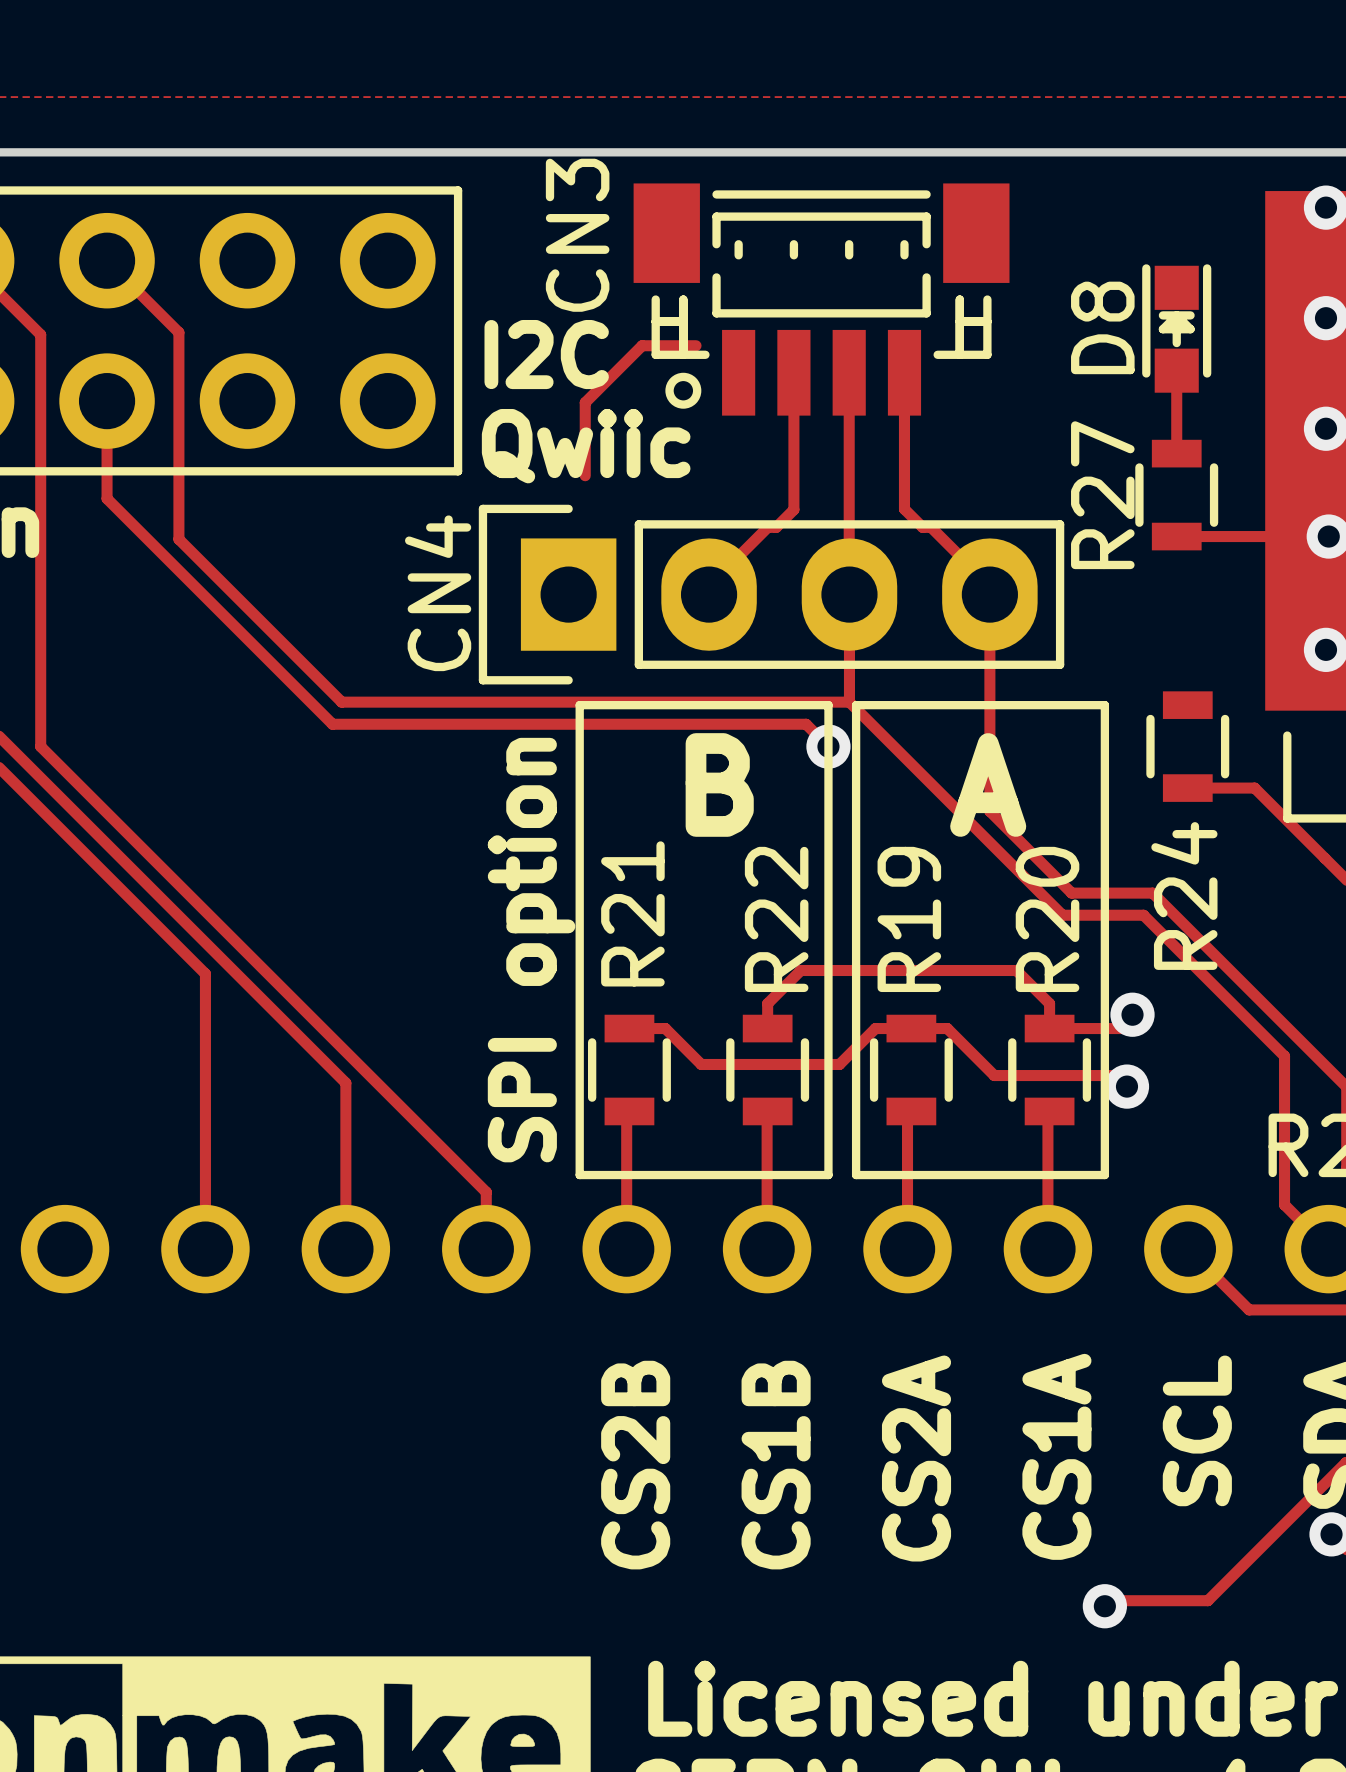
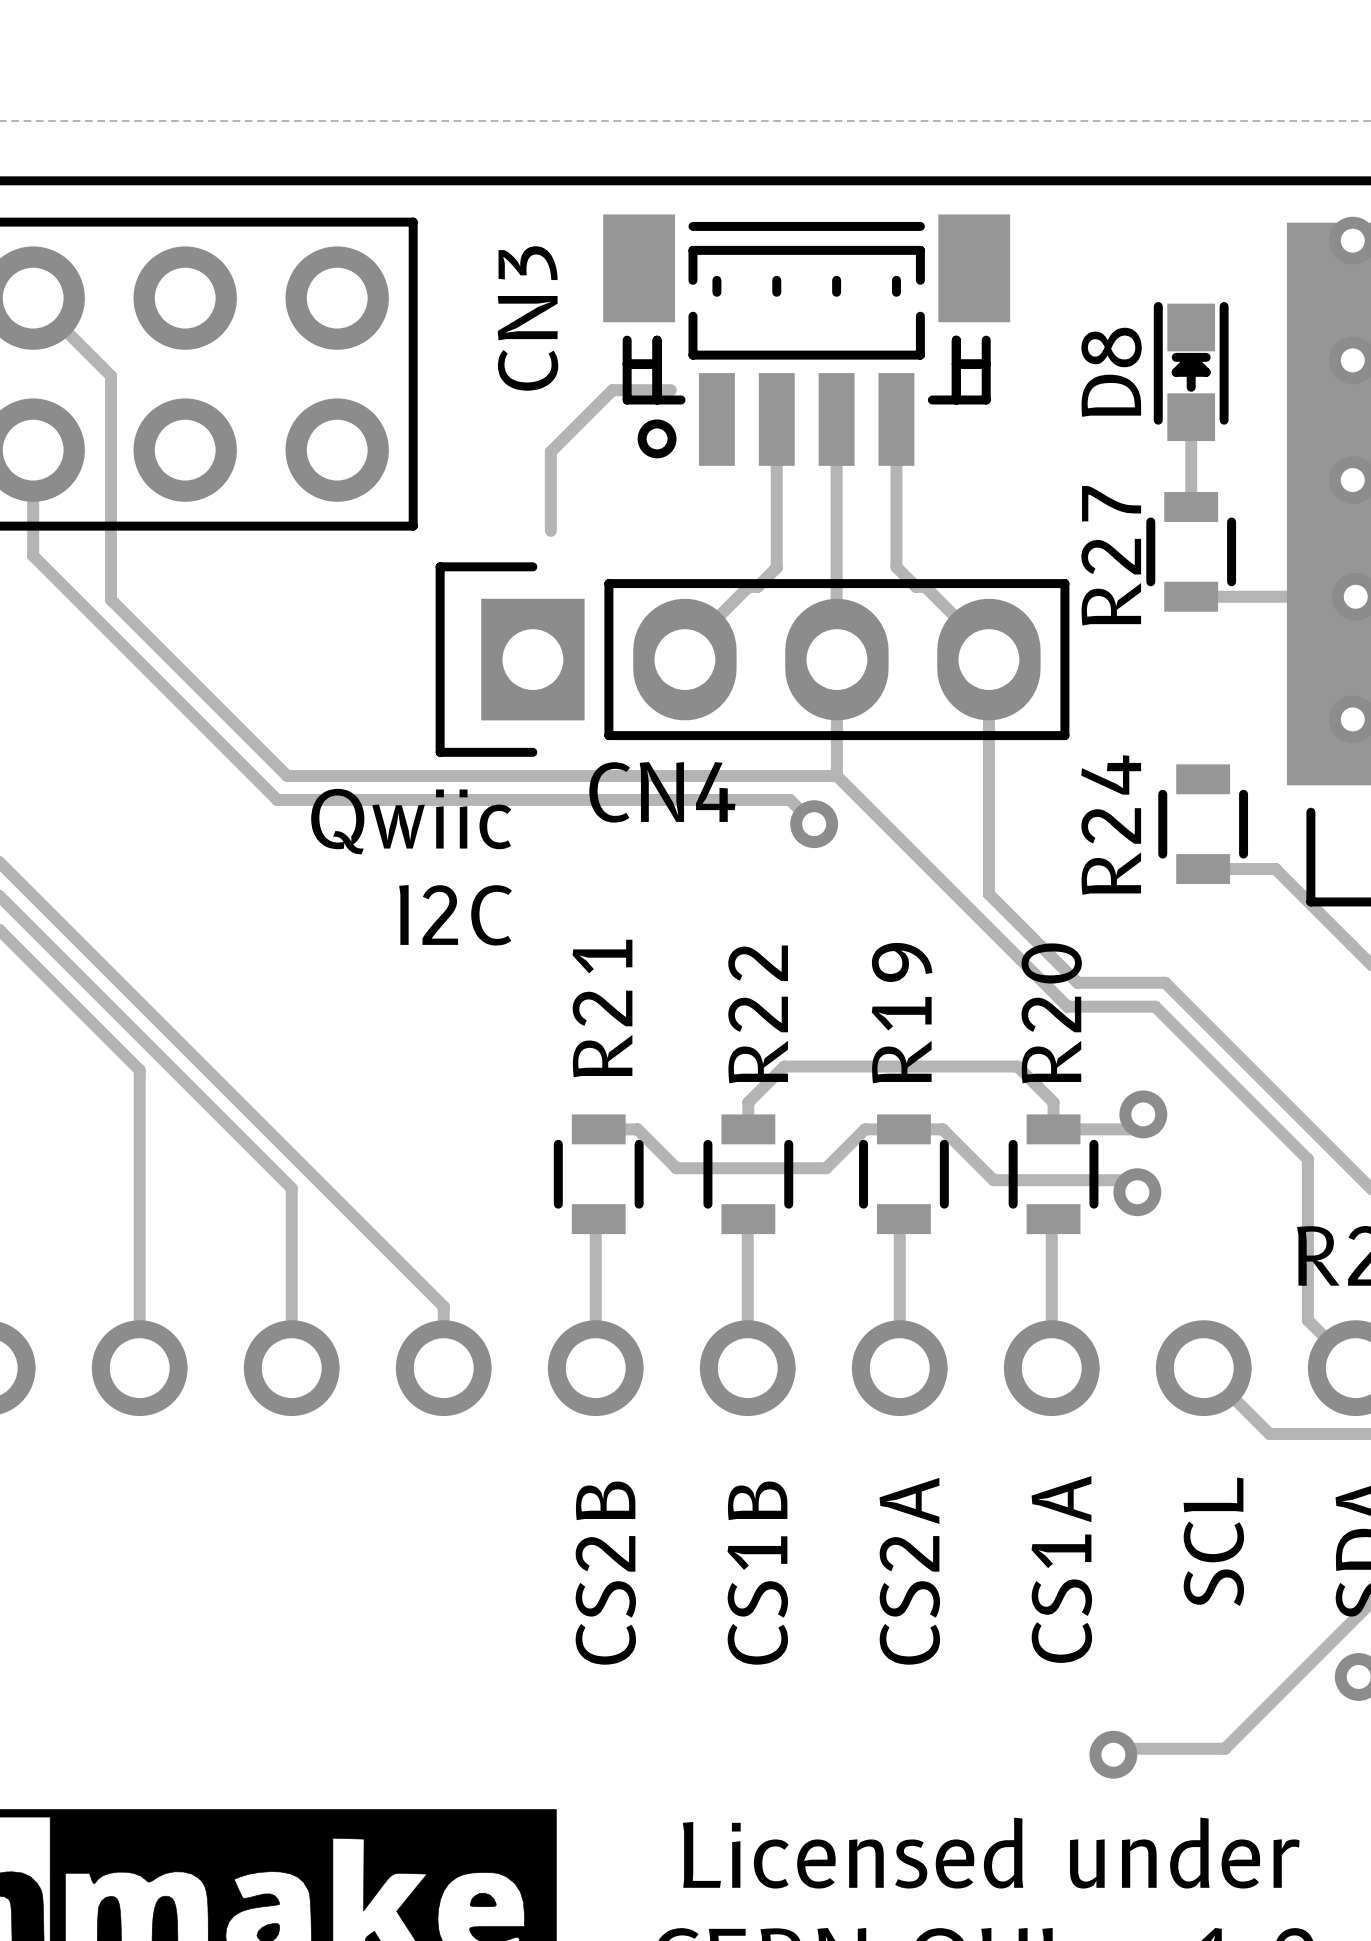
CN3 name position: CN3 (577, 235) -> CN3 (528, 318)
text position: I2C (546, 354) -> I2C (455, 915)
text position: Qwiic (586, 446) -> Qwiic (411, 821)
CN4 name rotation: 0° (438, 593) -> 90° clockwise (662, 792)
CN4 name position: CN4 (438, 593) -> CN4 (662, 792)
line: (579, 705) (828, 705) (828, 1175) (579, 1175) (579, 705) -> none
line: (856, 705) (856, 1175) (1104, 1175) (1104, 705) (856, 705) -> none
text: B (719, 784) -> none
text: A (988, 784) -> none
R24 name position: R24 (1184, 896) -> R24 (1111, 825)
text: SPI option (531, 950) -> none

